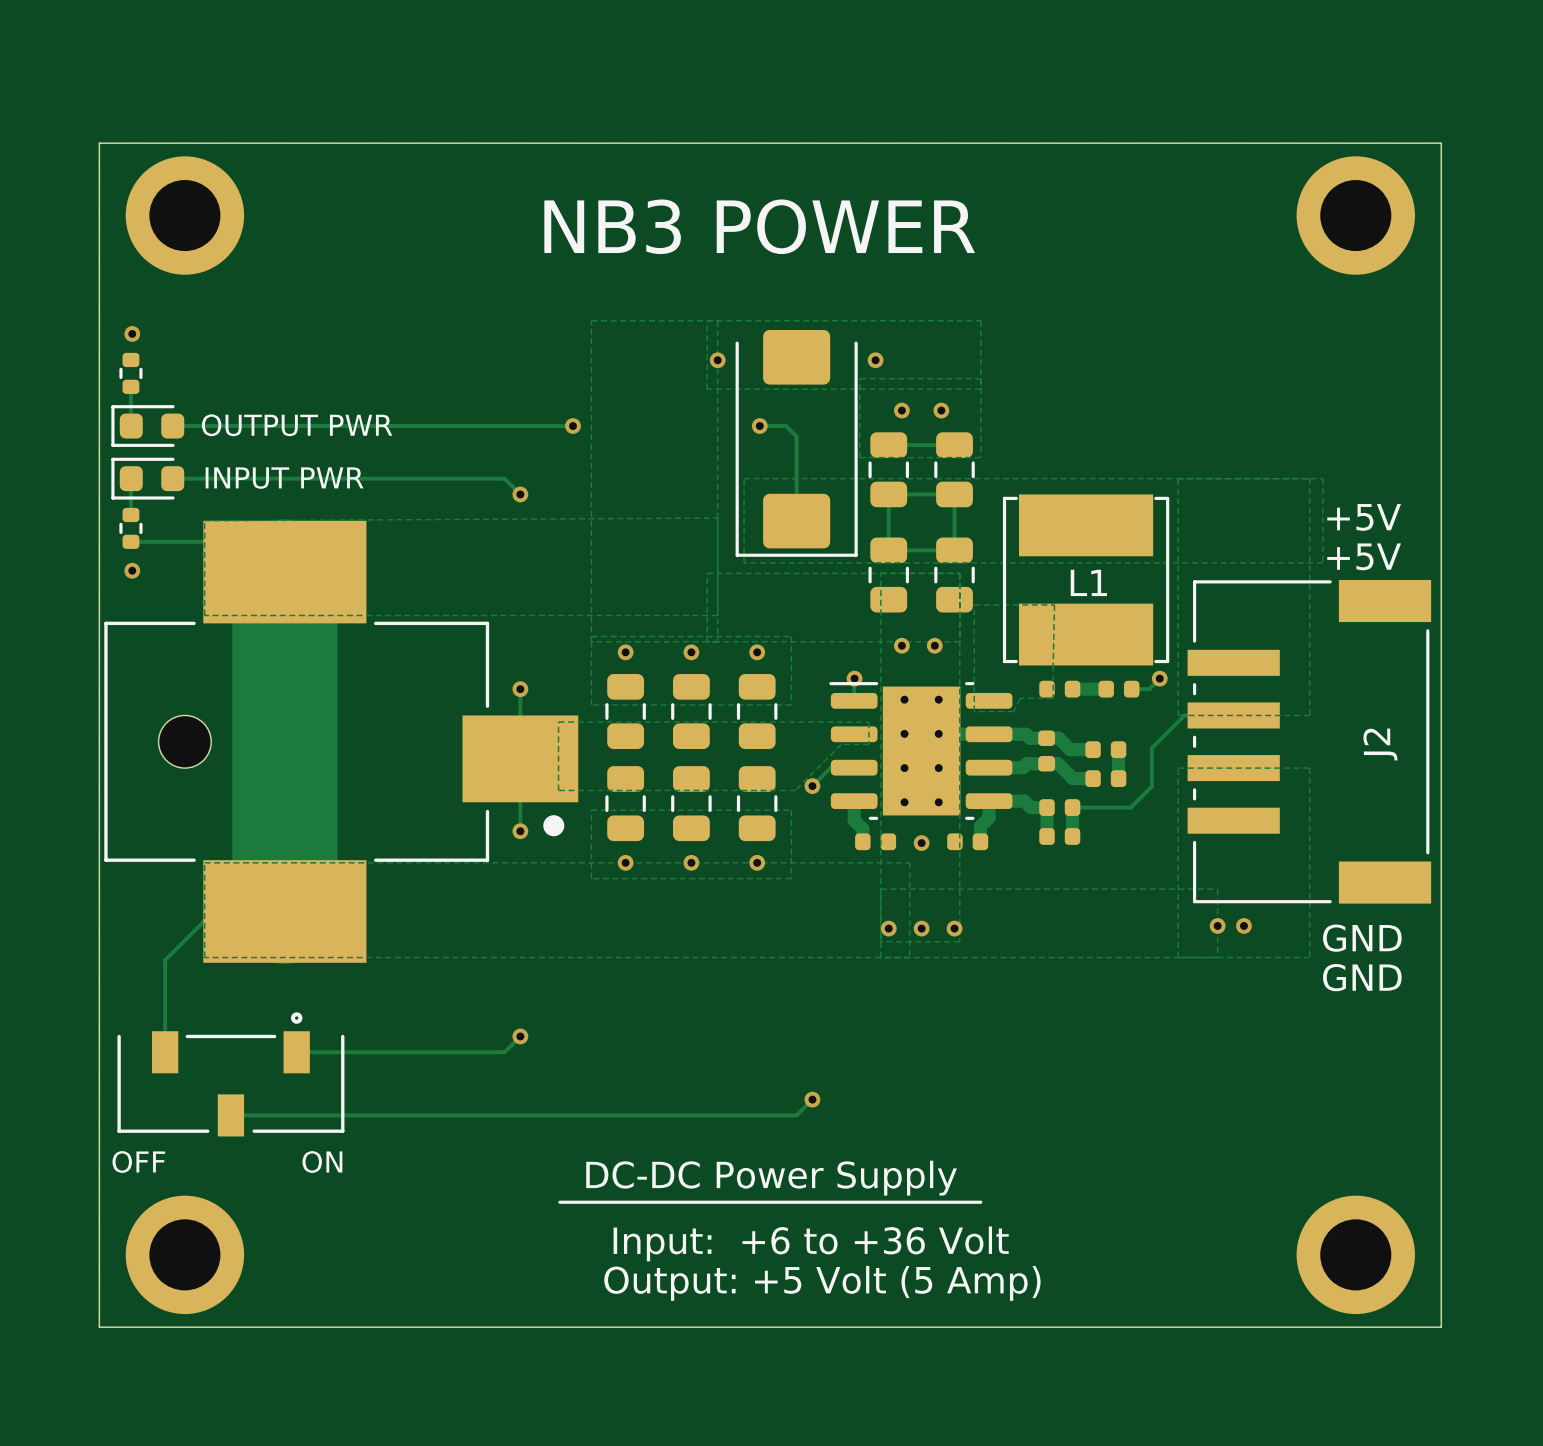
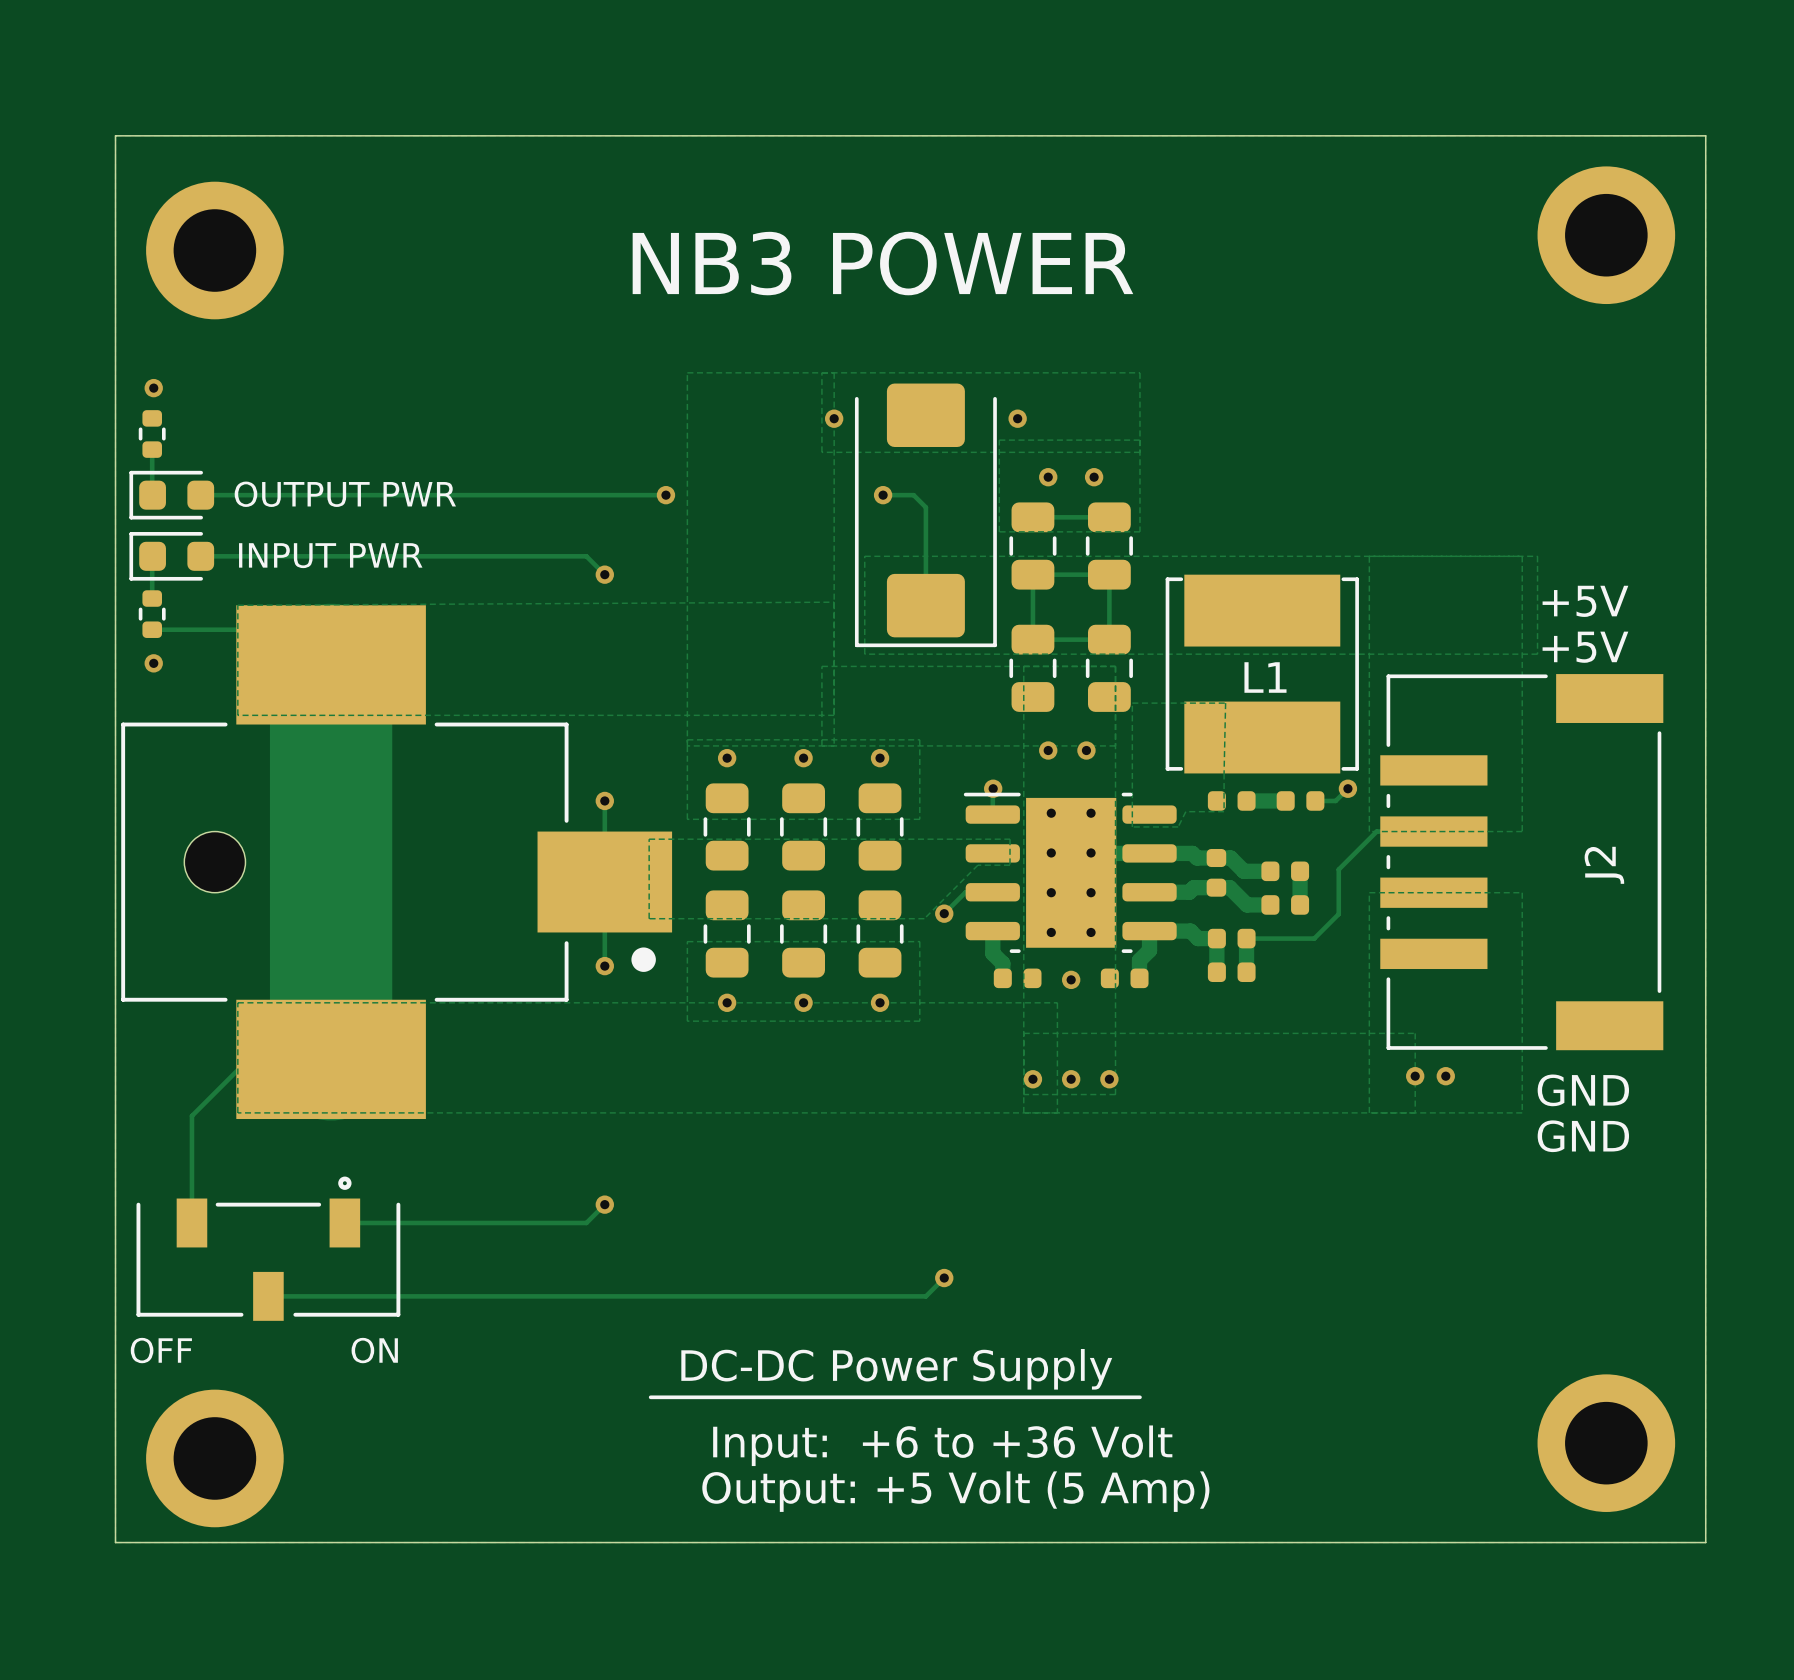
board edge: (99, 143) (1441, 143) (1441, 1327) -> (115, 166) (115, 135) (1705, 135) (1705, 1542) (1675, 1542)
part position: (1355, 215) -> (1606, 235)
part position: (1355, 1254) -> (1606, 1443)

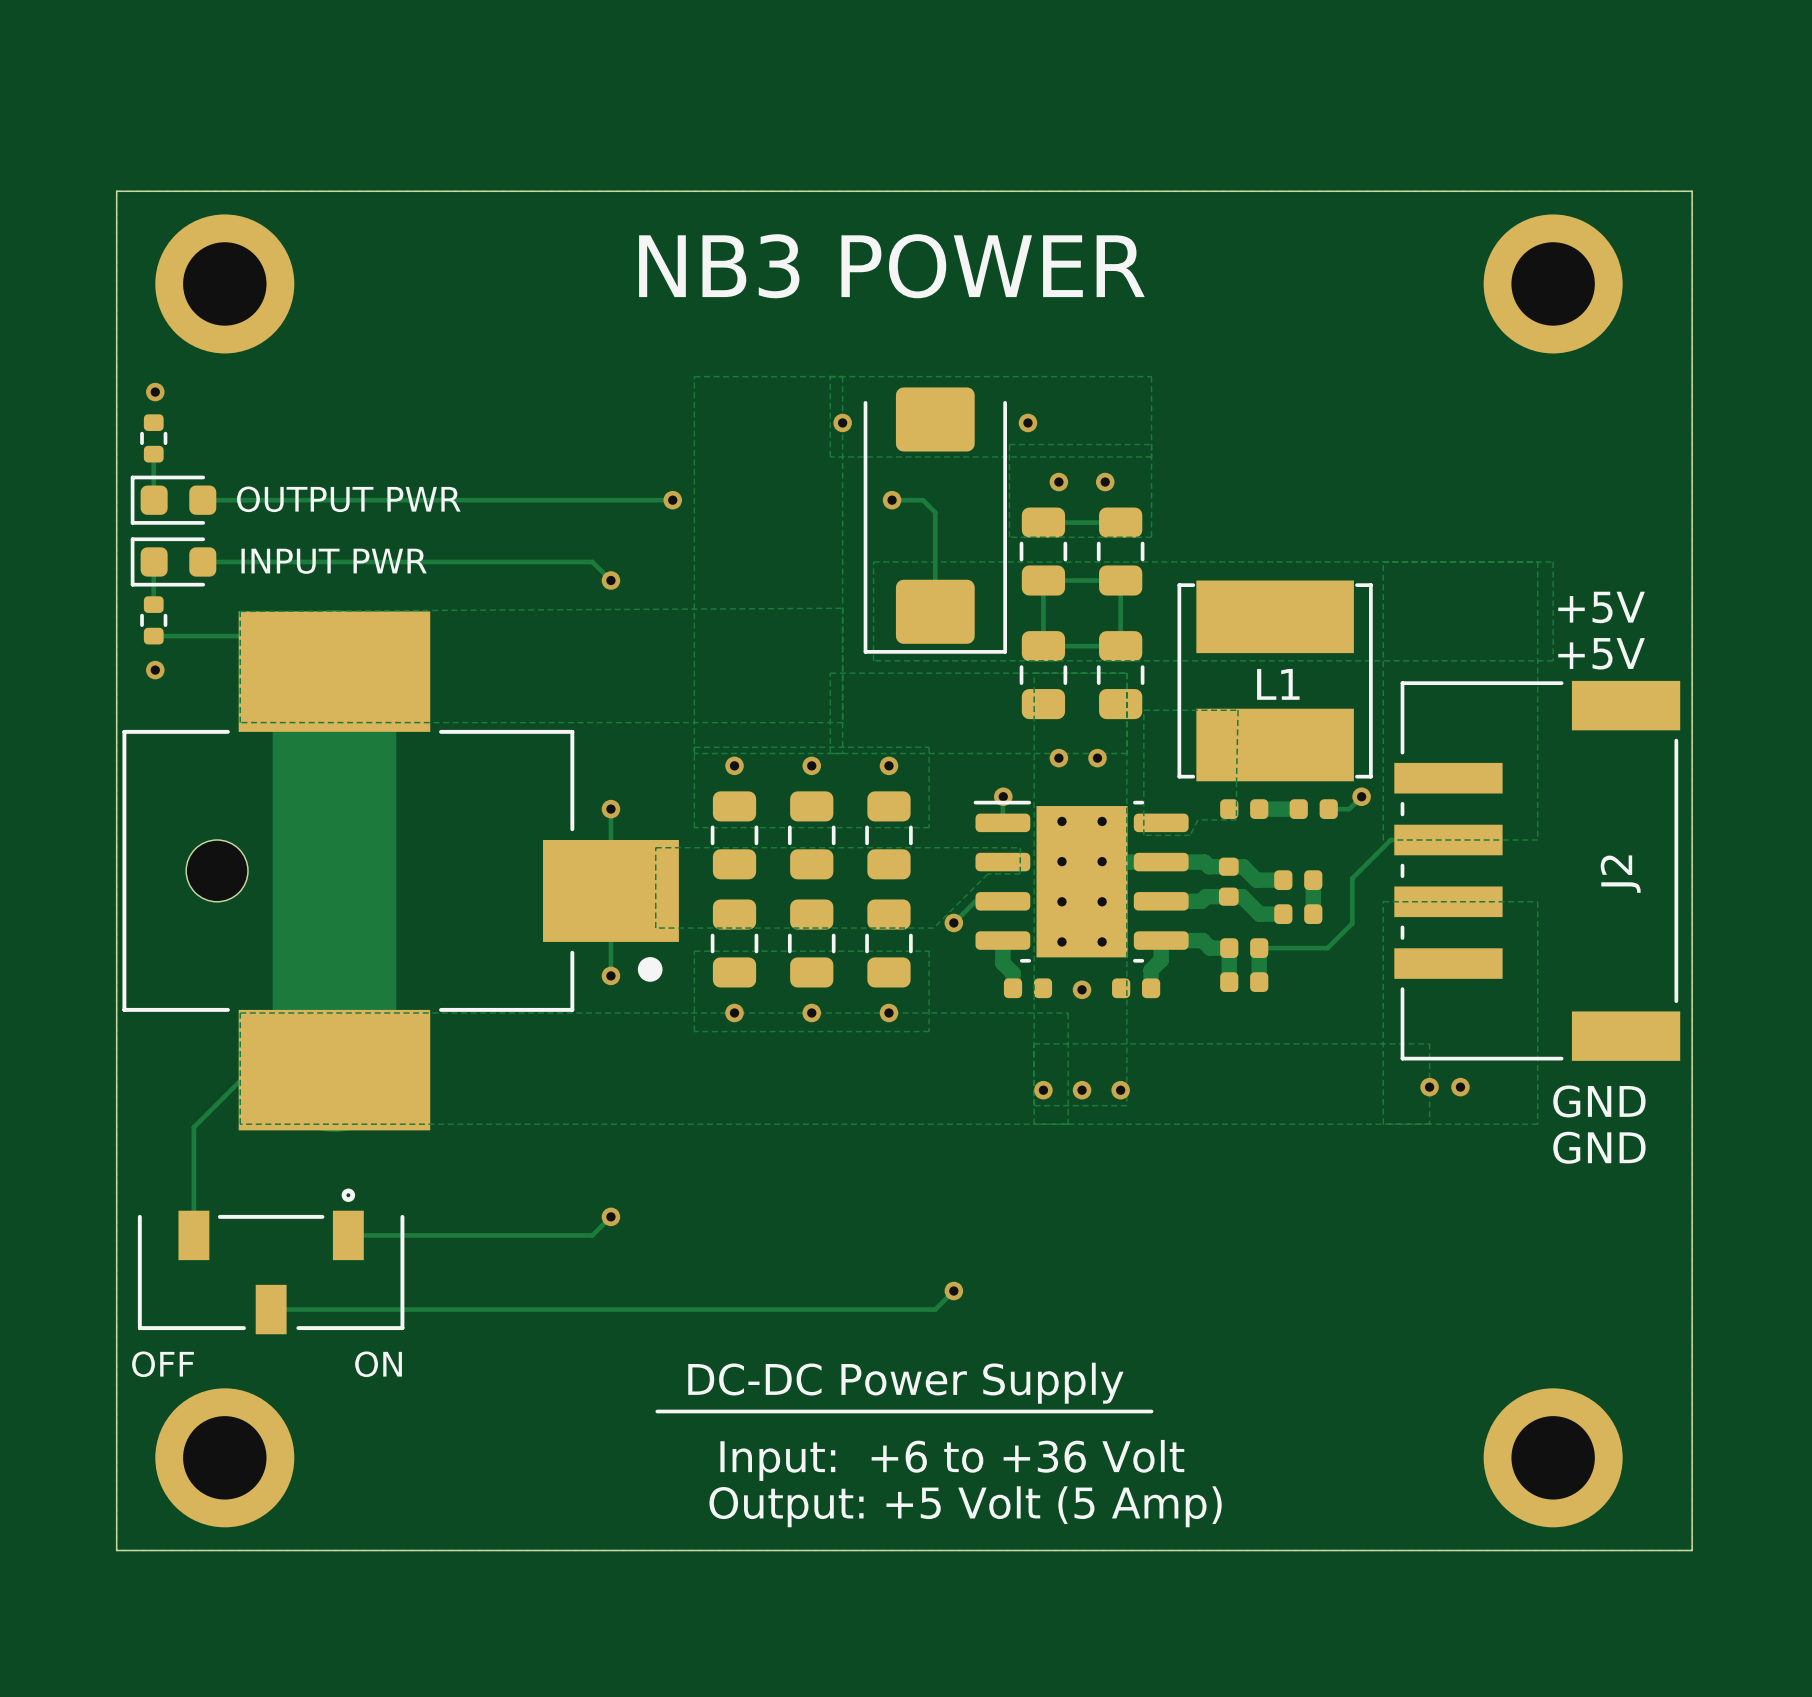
board edge: (115, 189) (115, 135) (1705, 135) (1705, 1542) (115, 1542) (115, 1534) -> (116, 191) (1692, 191) (1692, 1550) (116, 1550)
part position: (1606, 235) -> (1553, 283)
part position: (214, 250) -> (224, 283)
part position: (1606, 1443) -> (1553, 1457)
part position: (214, 1458) -> (224, 1457)

